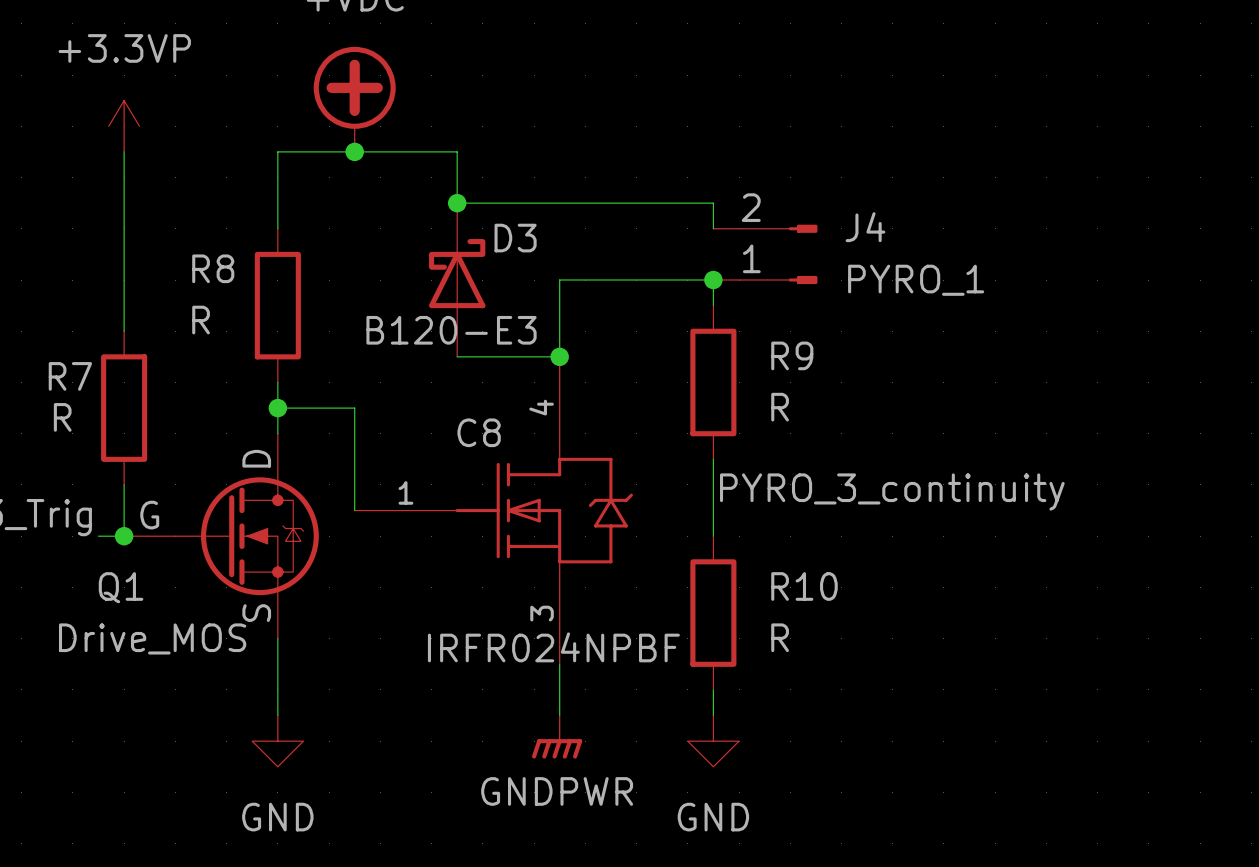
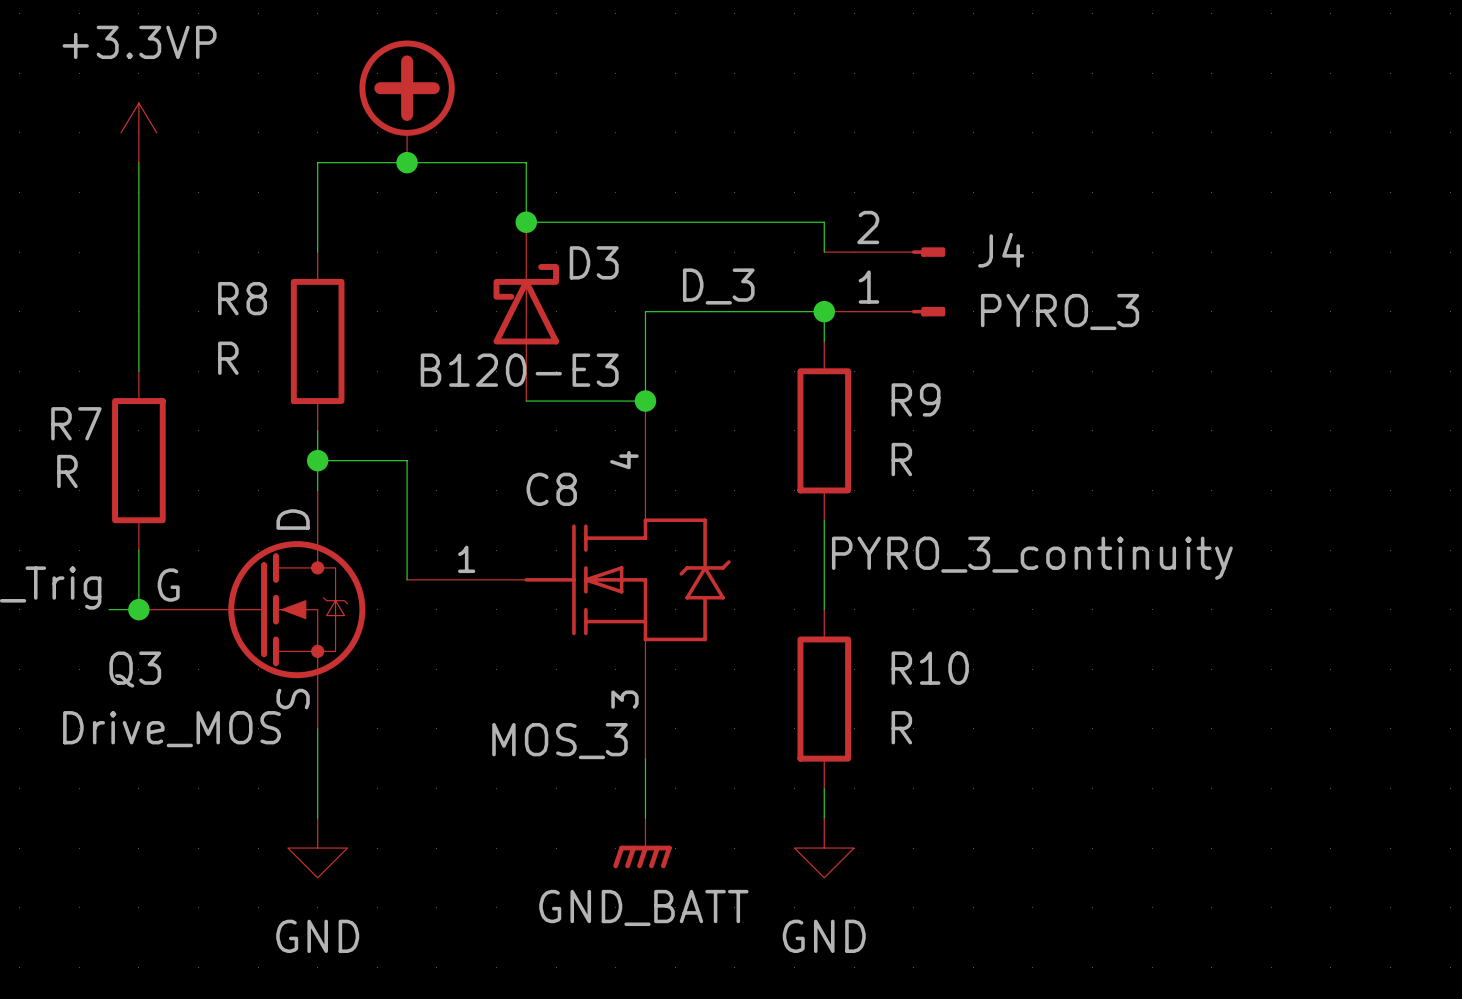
label: none -> D_3 (718, 286)
J4 value: PYRO_1 (916, 280) -> PYRO_3 (1060, 311)
Q1 name: Q1 (121, 587) -> Q3 (135, 669)
C8 value: IRFR024NPBF (553, 647) -> MOS_3 (559, 741)
power symbol: GNDPWR (557, 737) -> GND_BATT (642, 843)

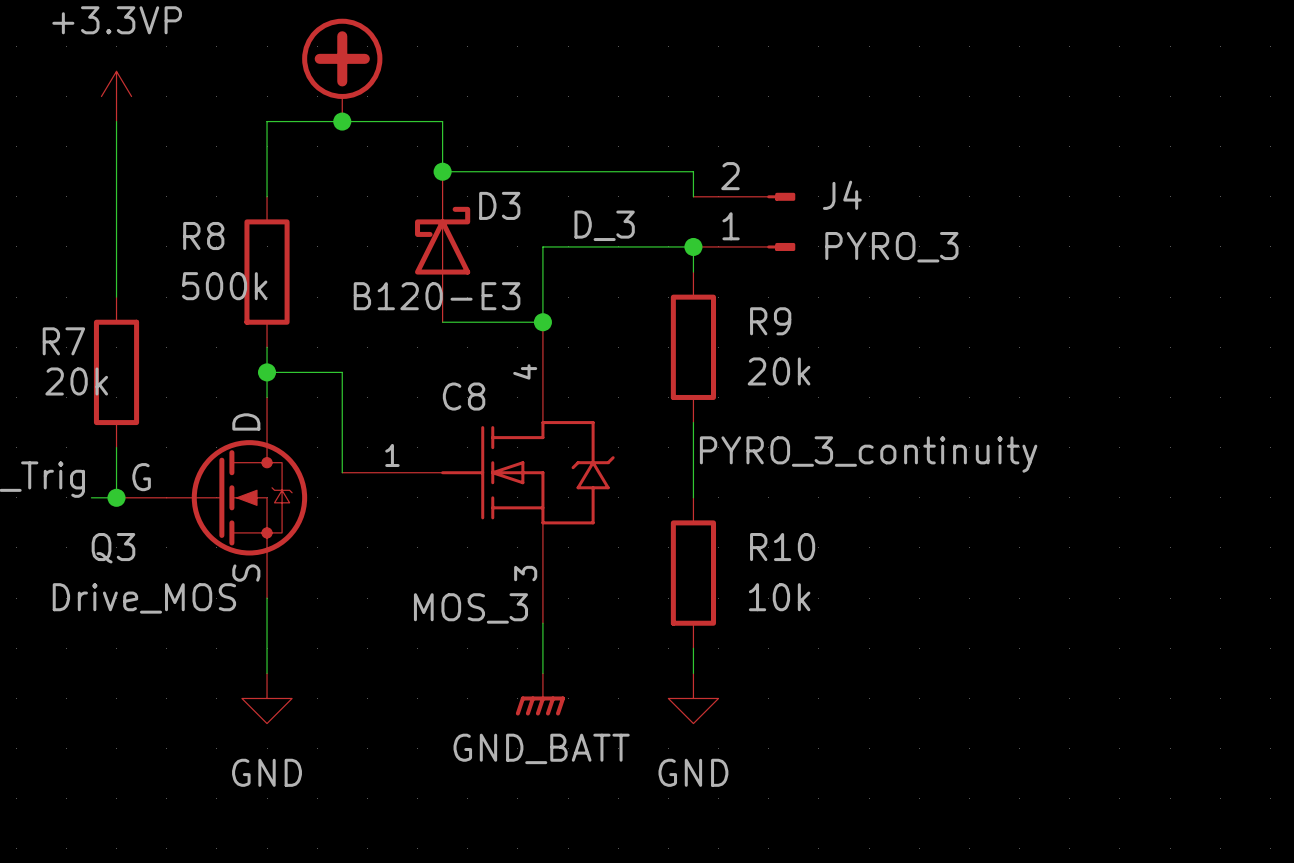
R8 value: R (228, 358) -> 500k (224, 286)
R9 value: R (901, 459) -> 20k (779, 371)
R7 value: R (67, 471) -> 20k (76, 381)
R10 value: R (901, 727) -> 10k (779, 597)

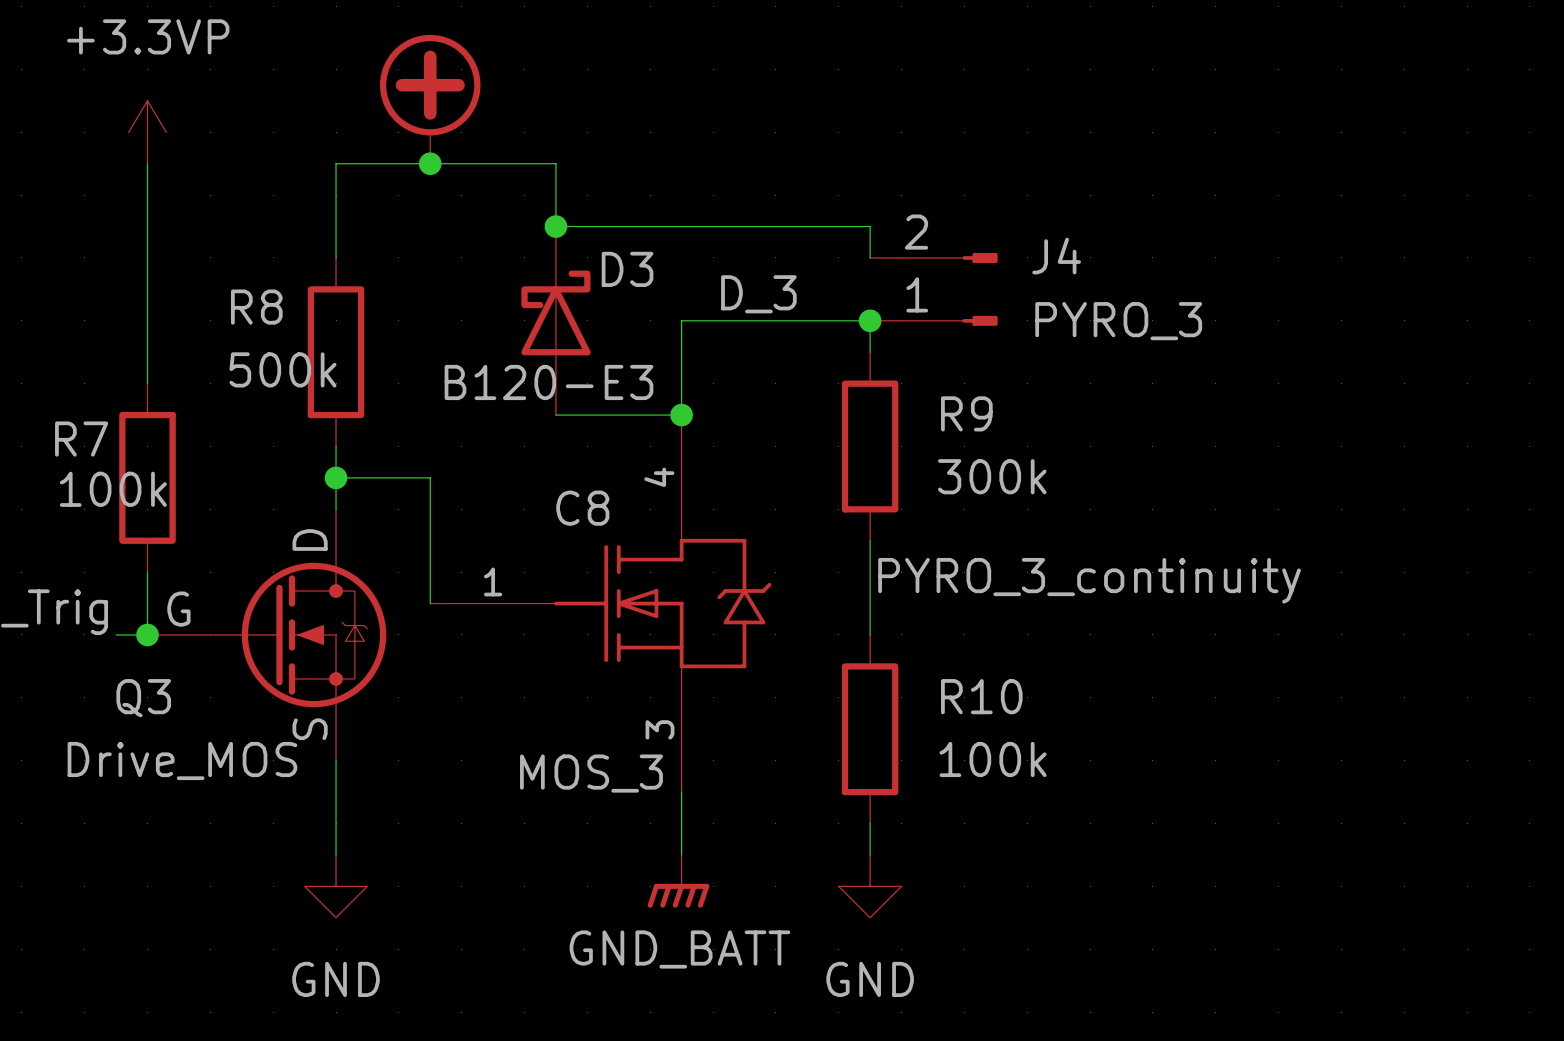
R9 value: 20k (779, 371) -> 300k (992, 476)
R7 value: 20k (76, 381) -> 100k (113, 489)
R10 value: 10k (779, 597) -> 100k (993, 759)

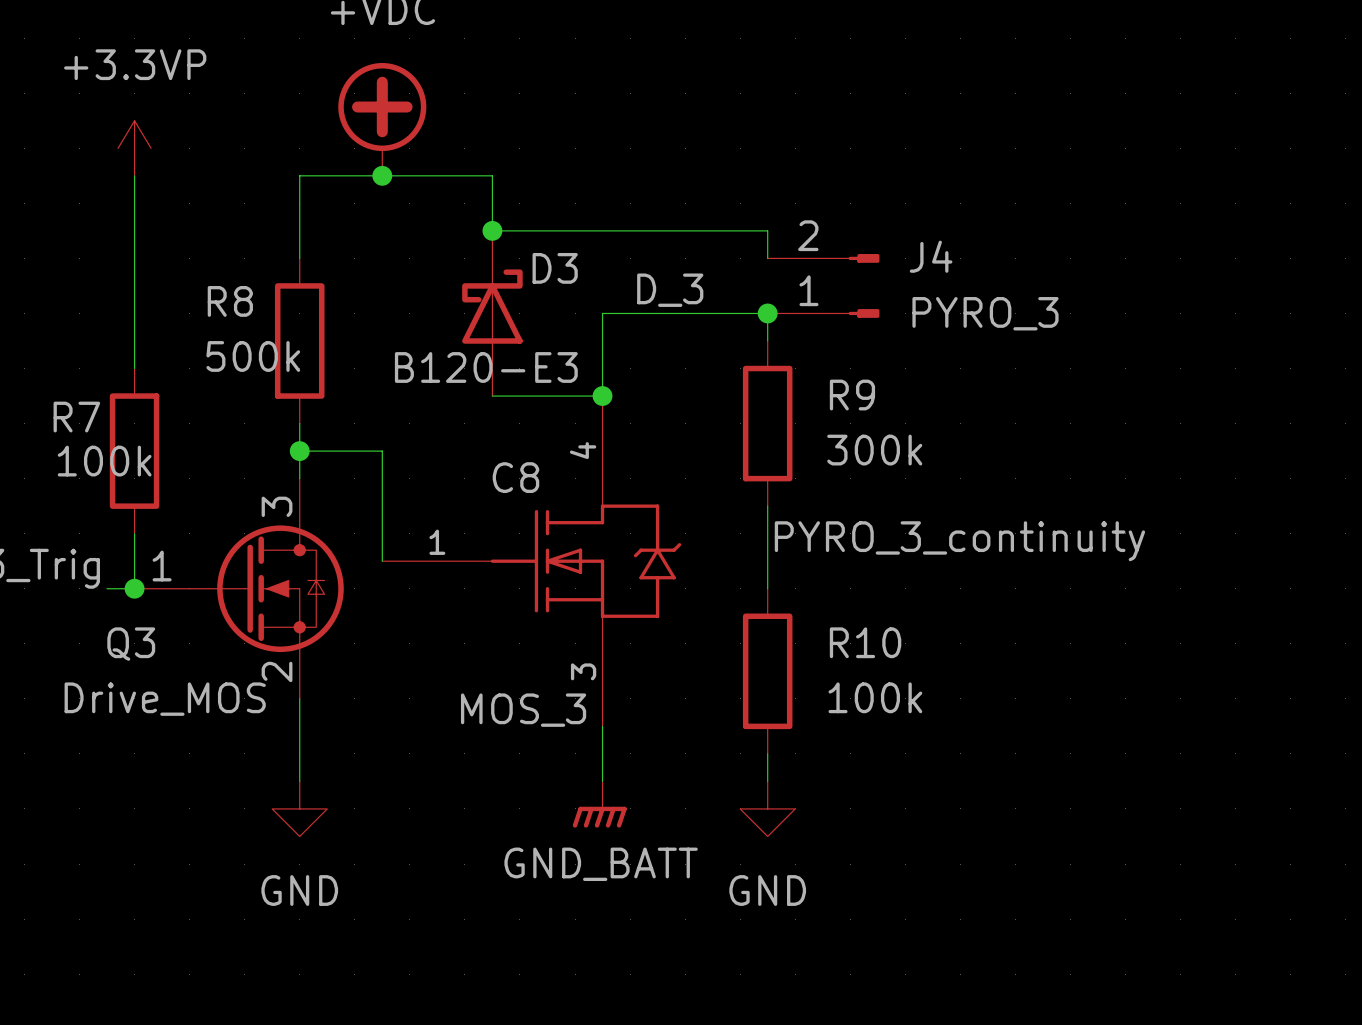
Q3 symbol: [147, 509, 387, 761] -> [134, 478, 344, 699]

